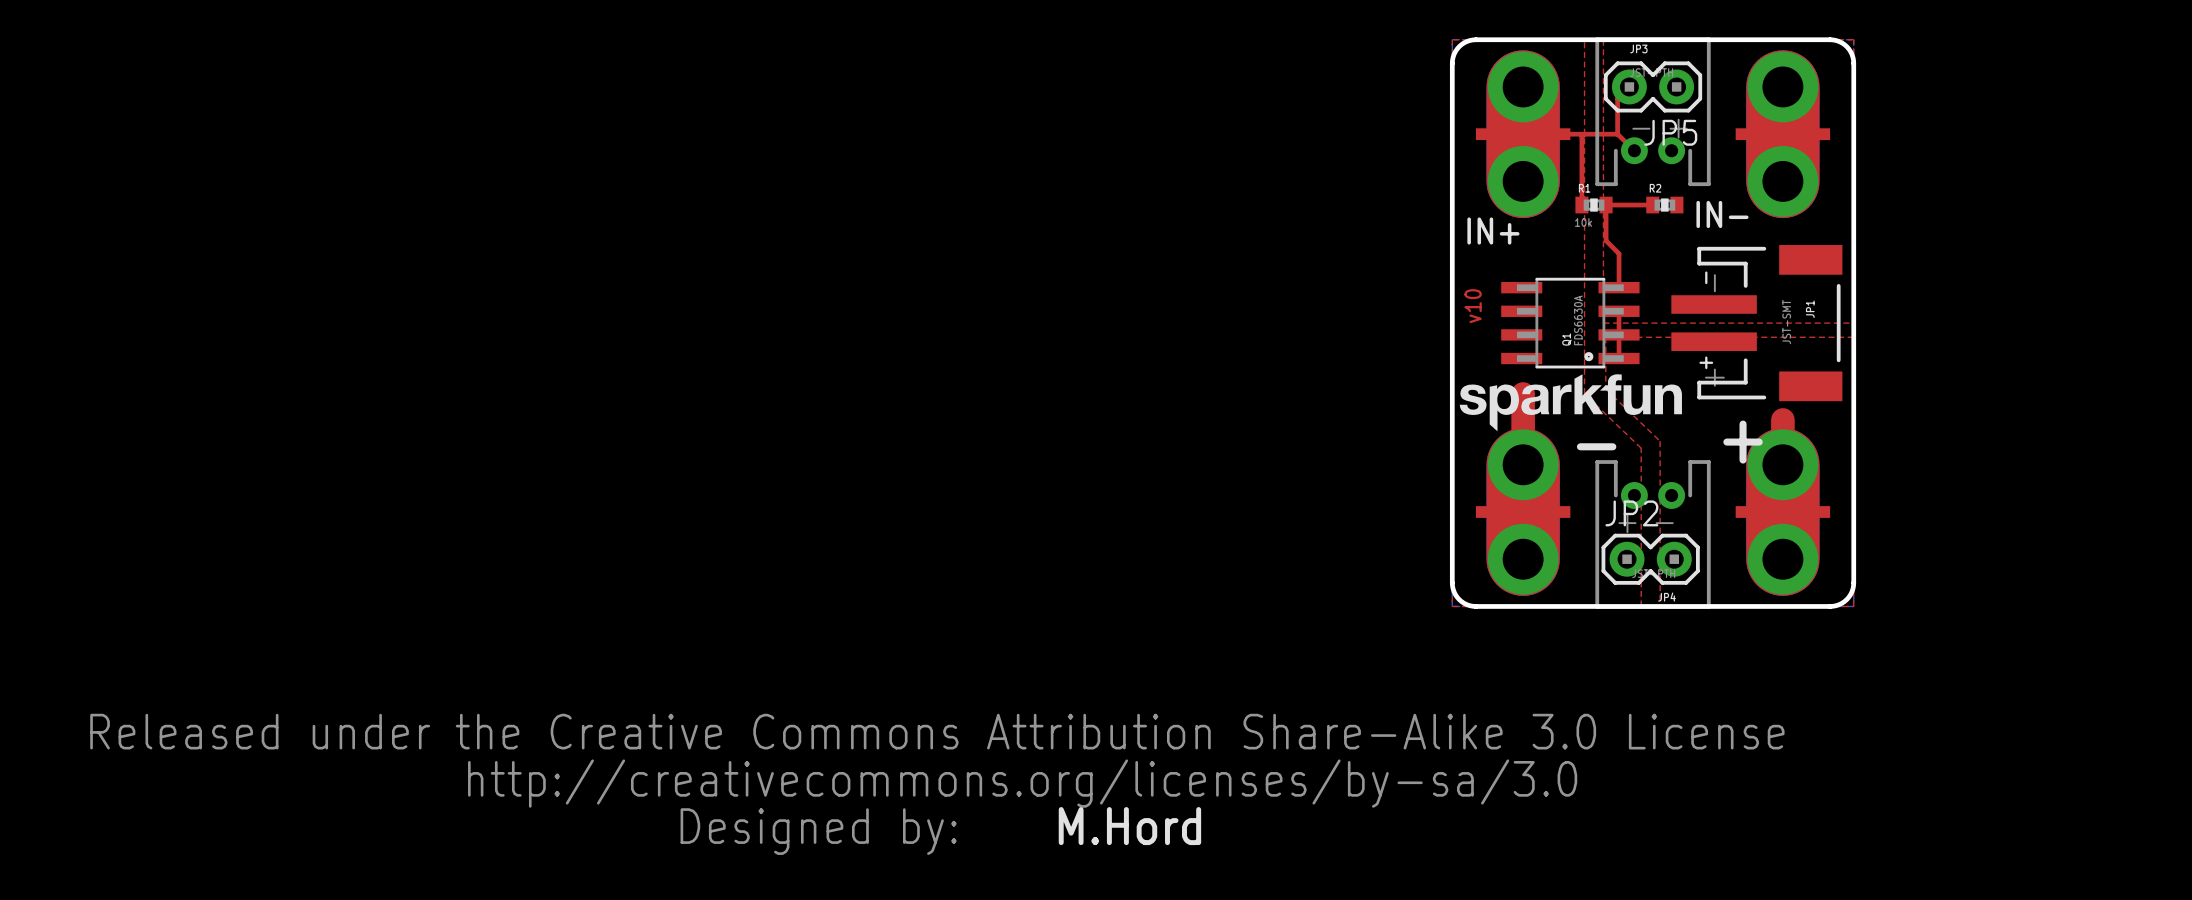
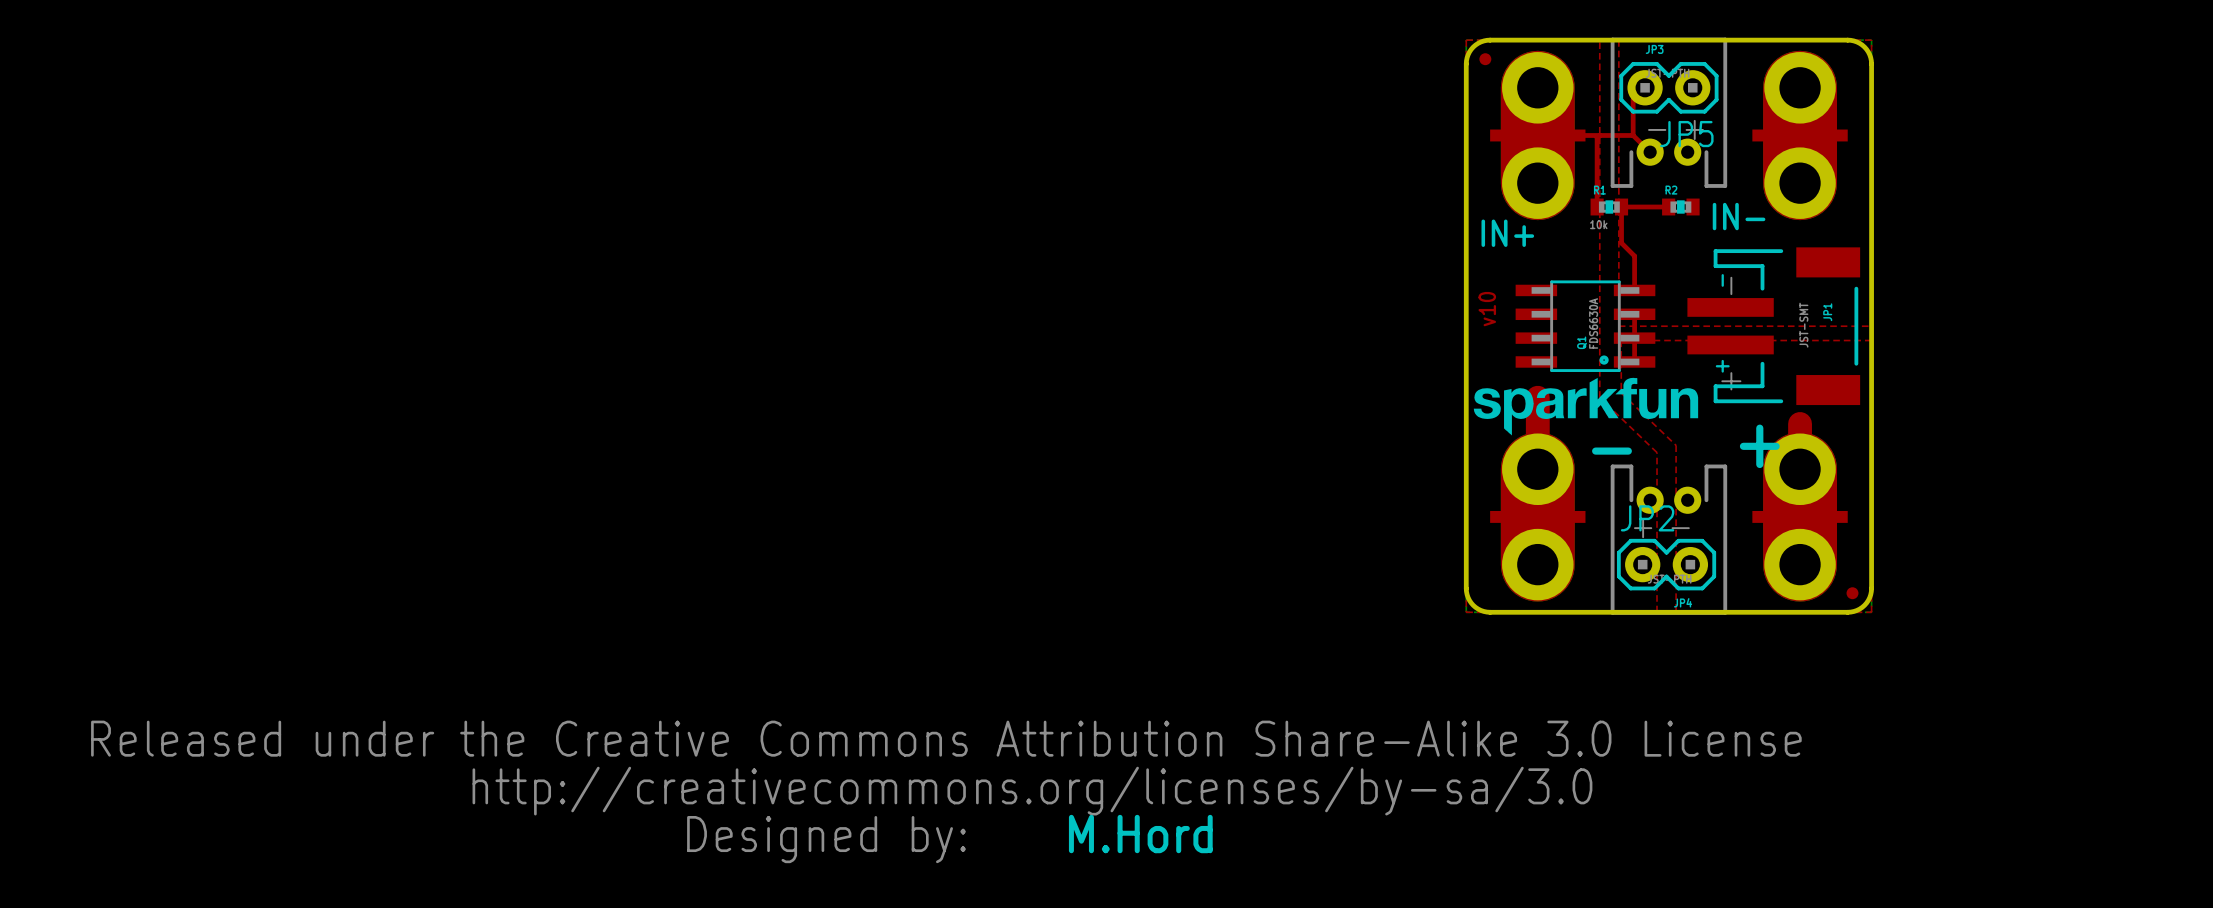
part: none -> (1485, 59)
part: none -> (1852, 593)

